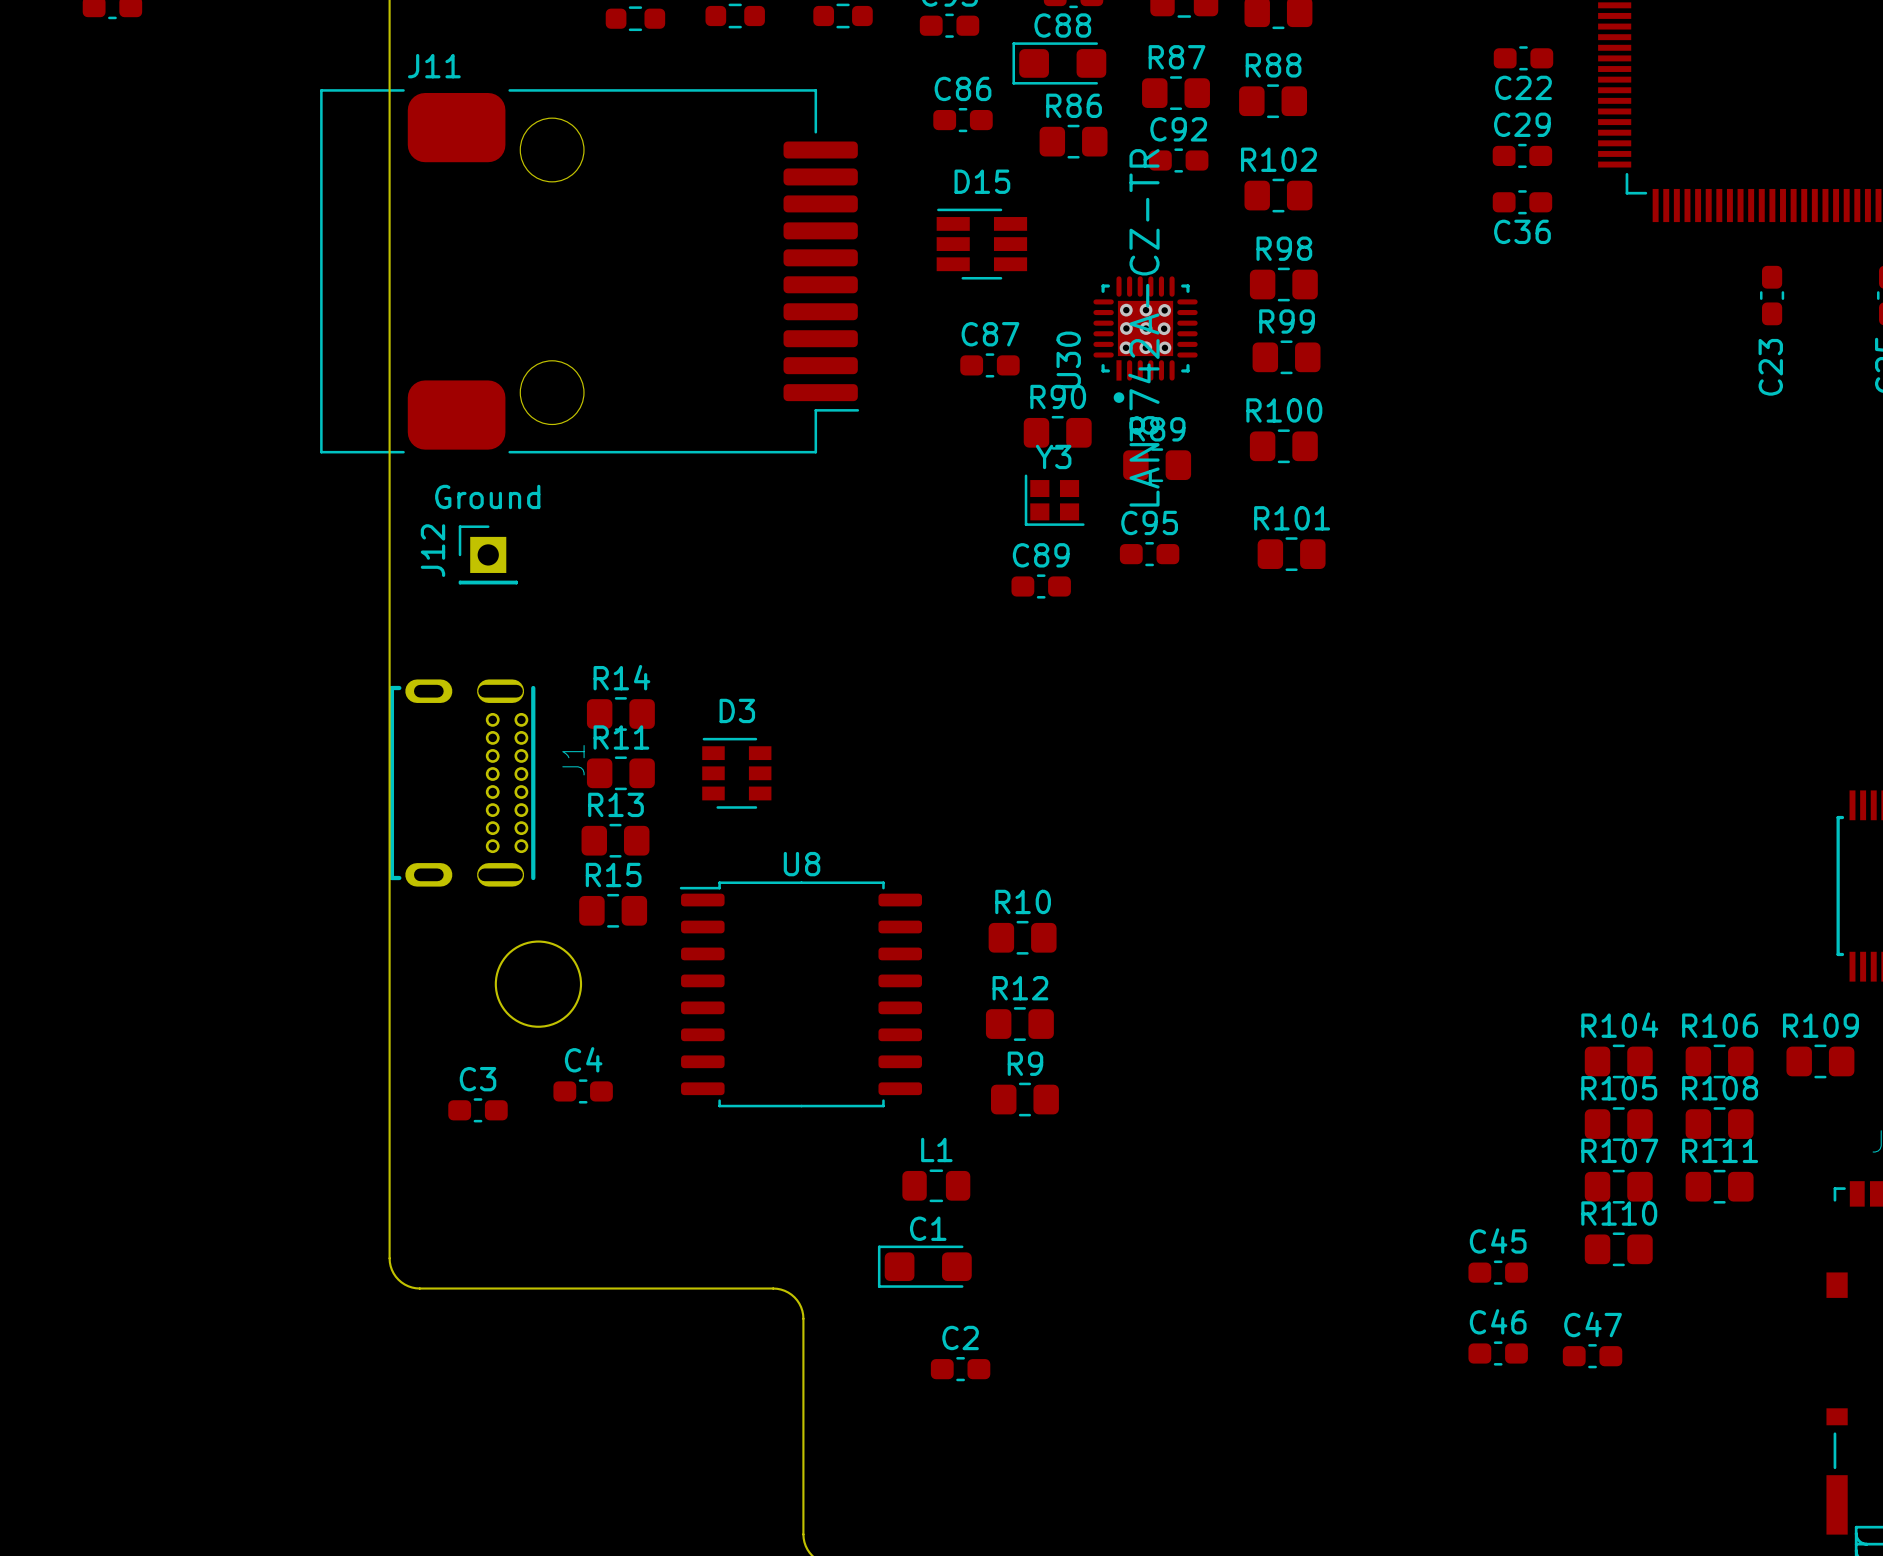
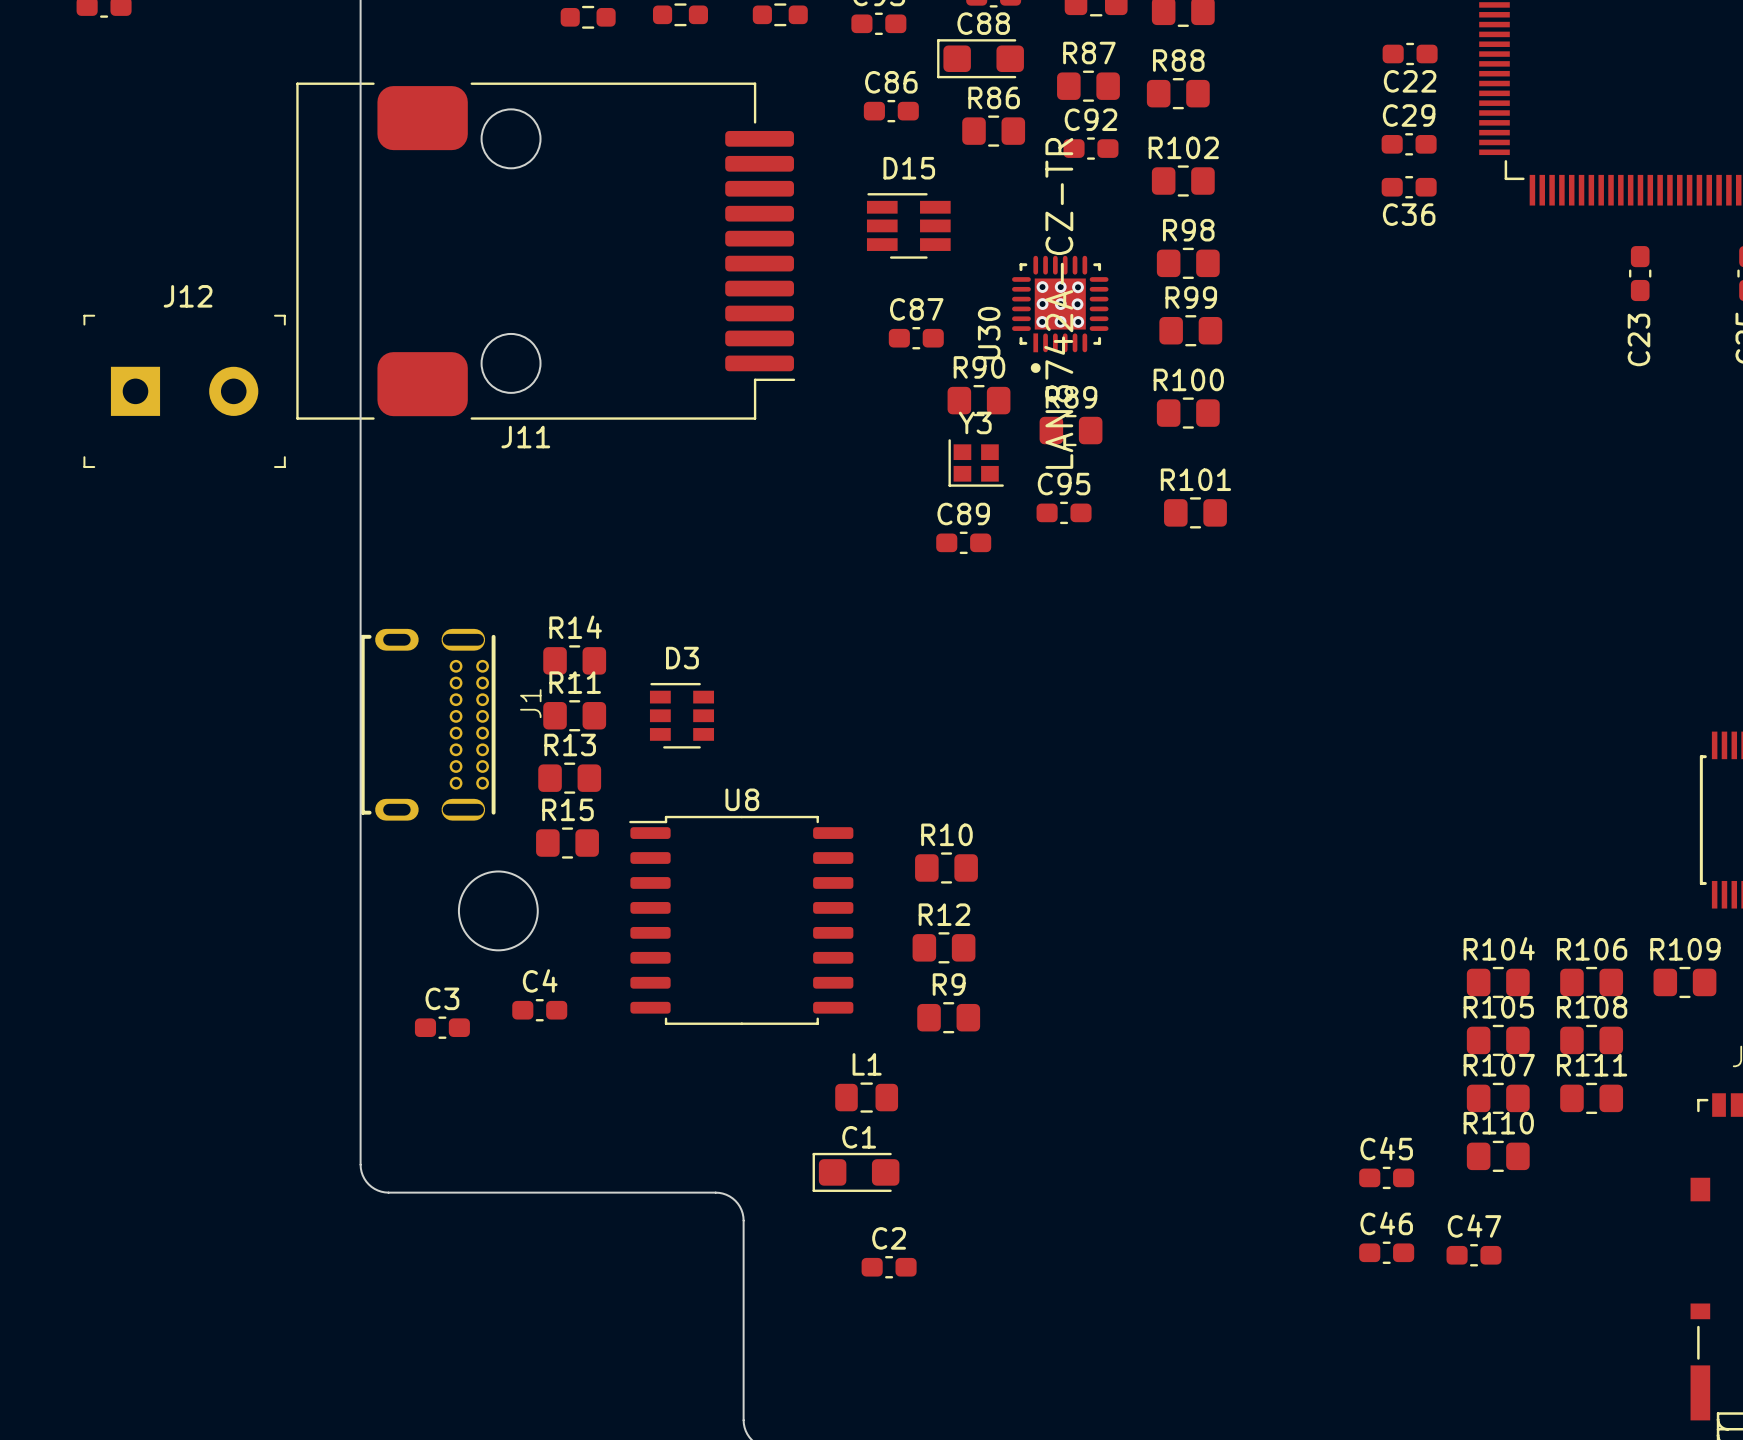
J11 name position: J11 (434, 66) -> J11 (525, 437)
J12 value: Ground (487, 496) -> none
J12 footprint: [458, 525, 518, 585] -> [83, 314, 286, 468]
J12 name position: J12 (432, 550) -> J12 (188, 296)

